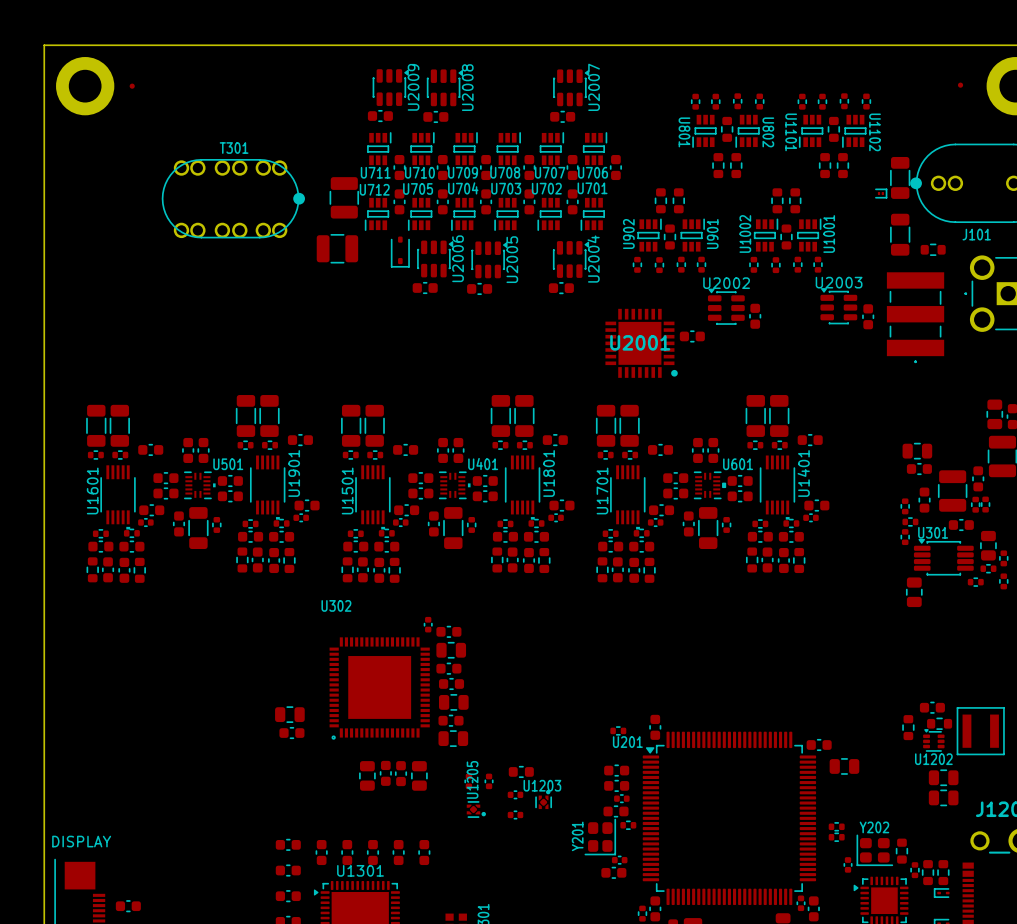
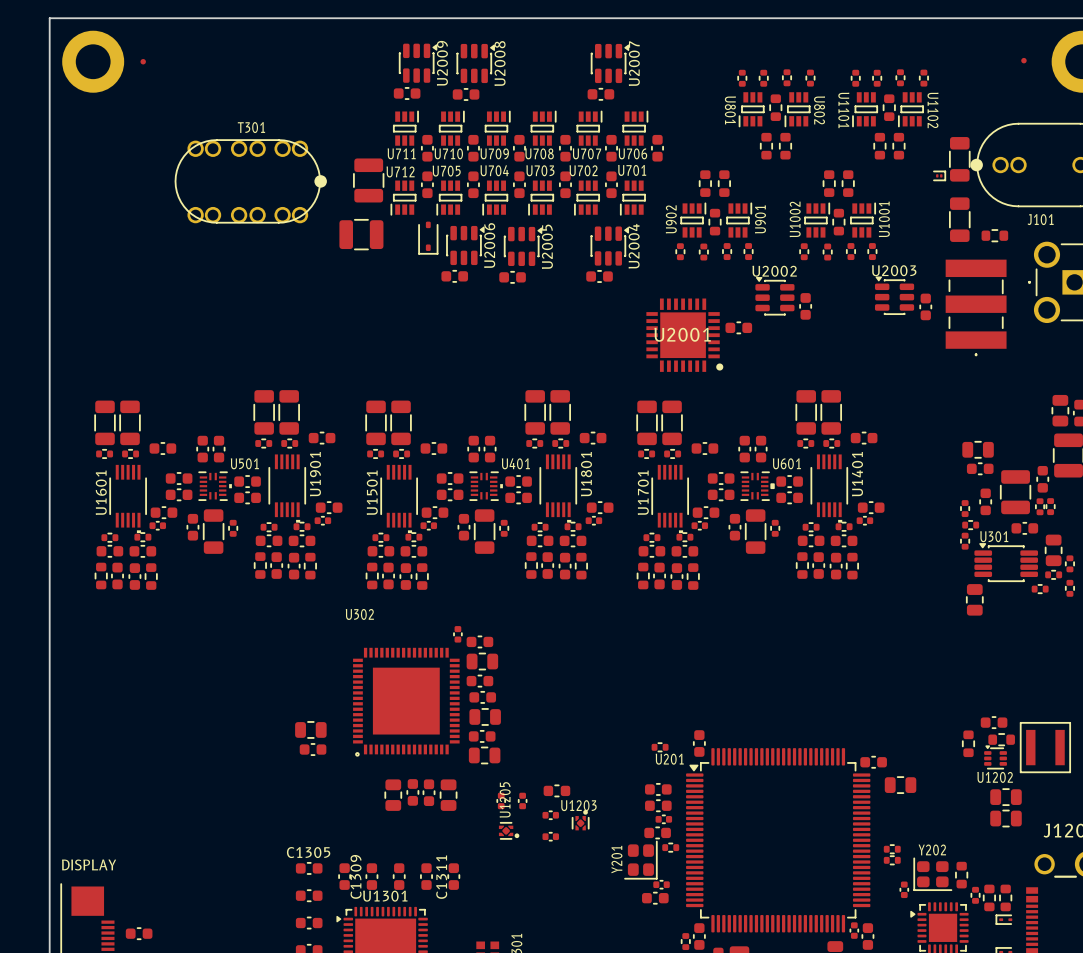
C1305 name: none -> C1305 (308, 852)
C1309 name: none -> C1309 (356, 876)
C1311 name: none -> C1311 (441, 877)

